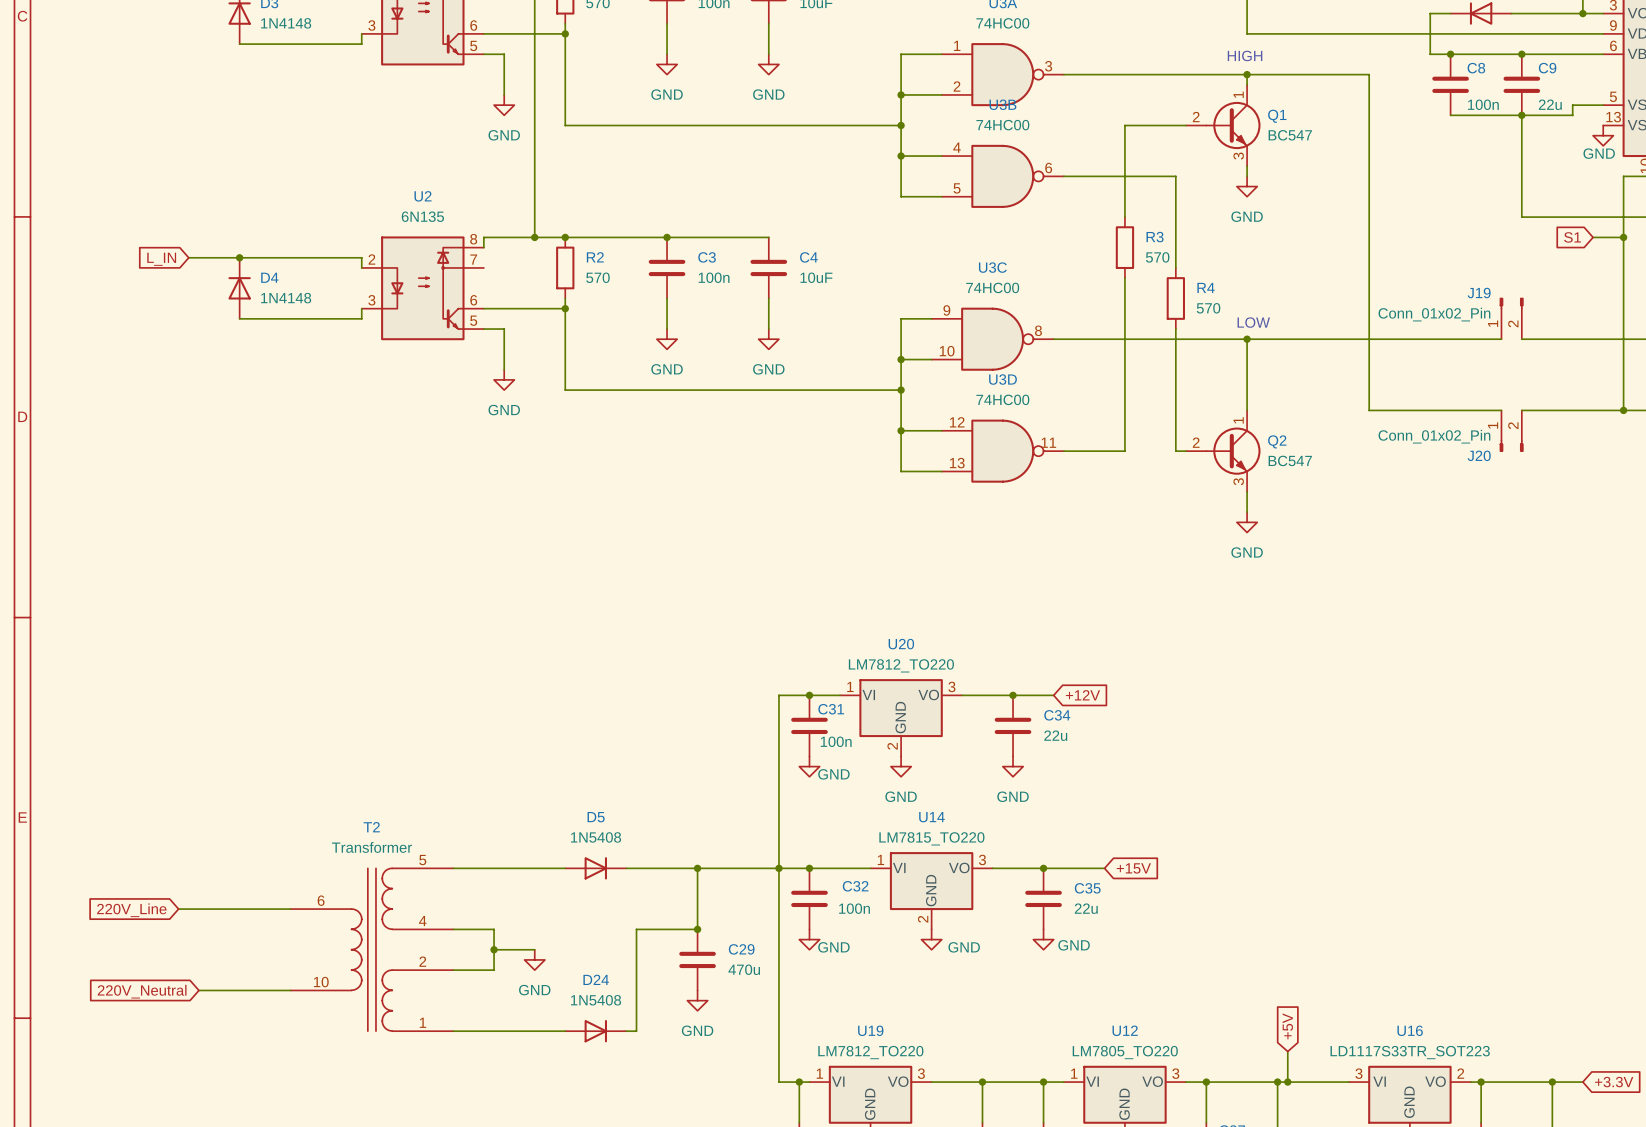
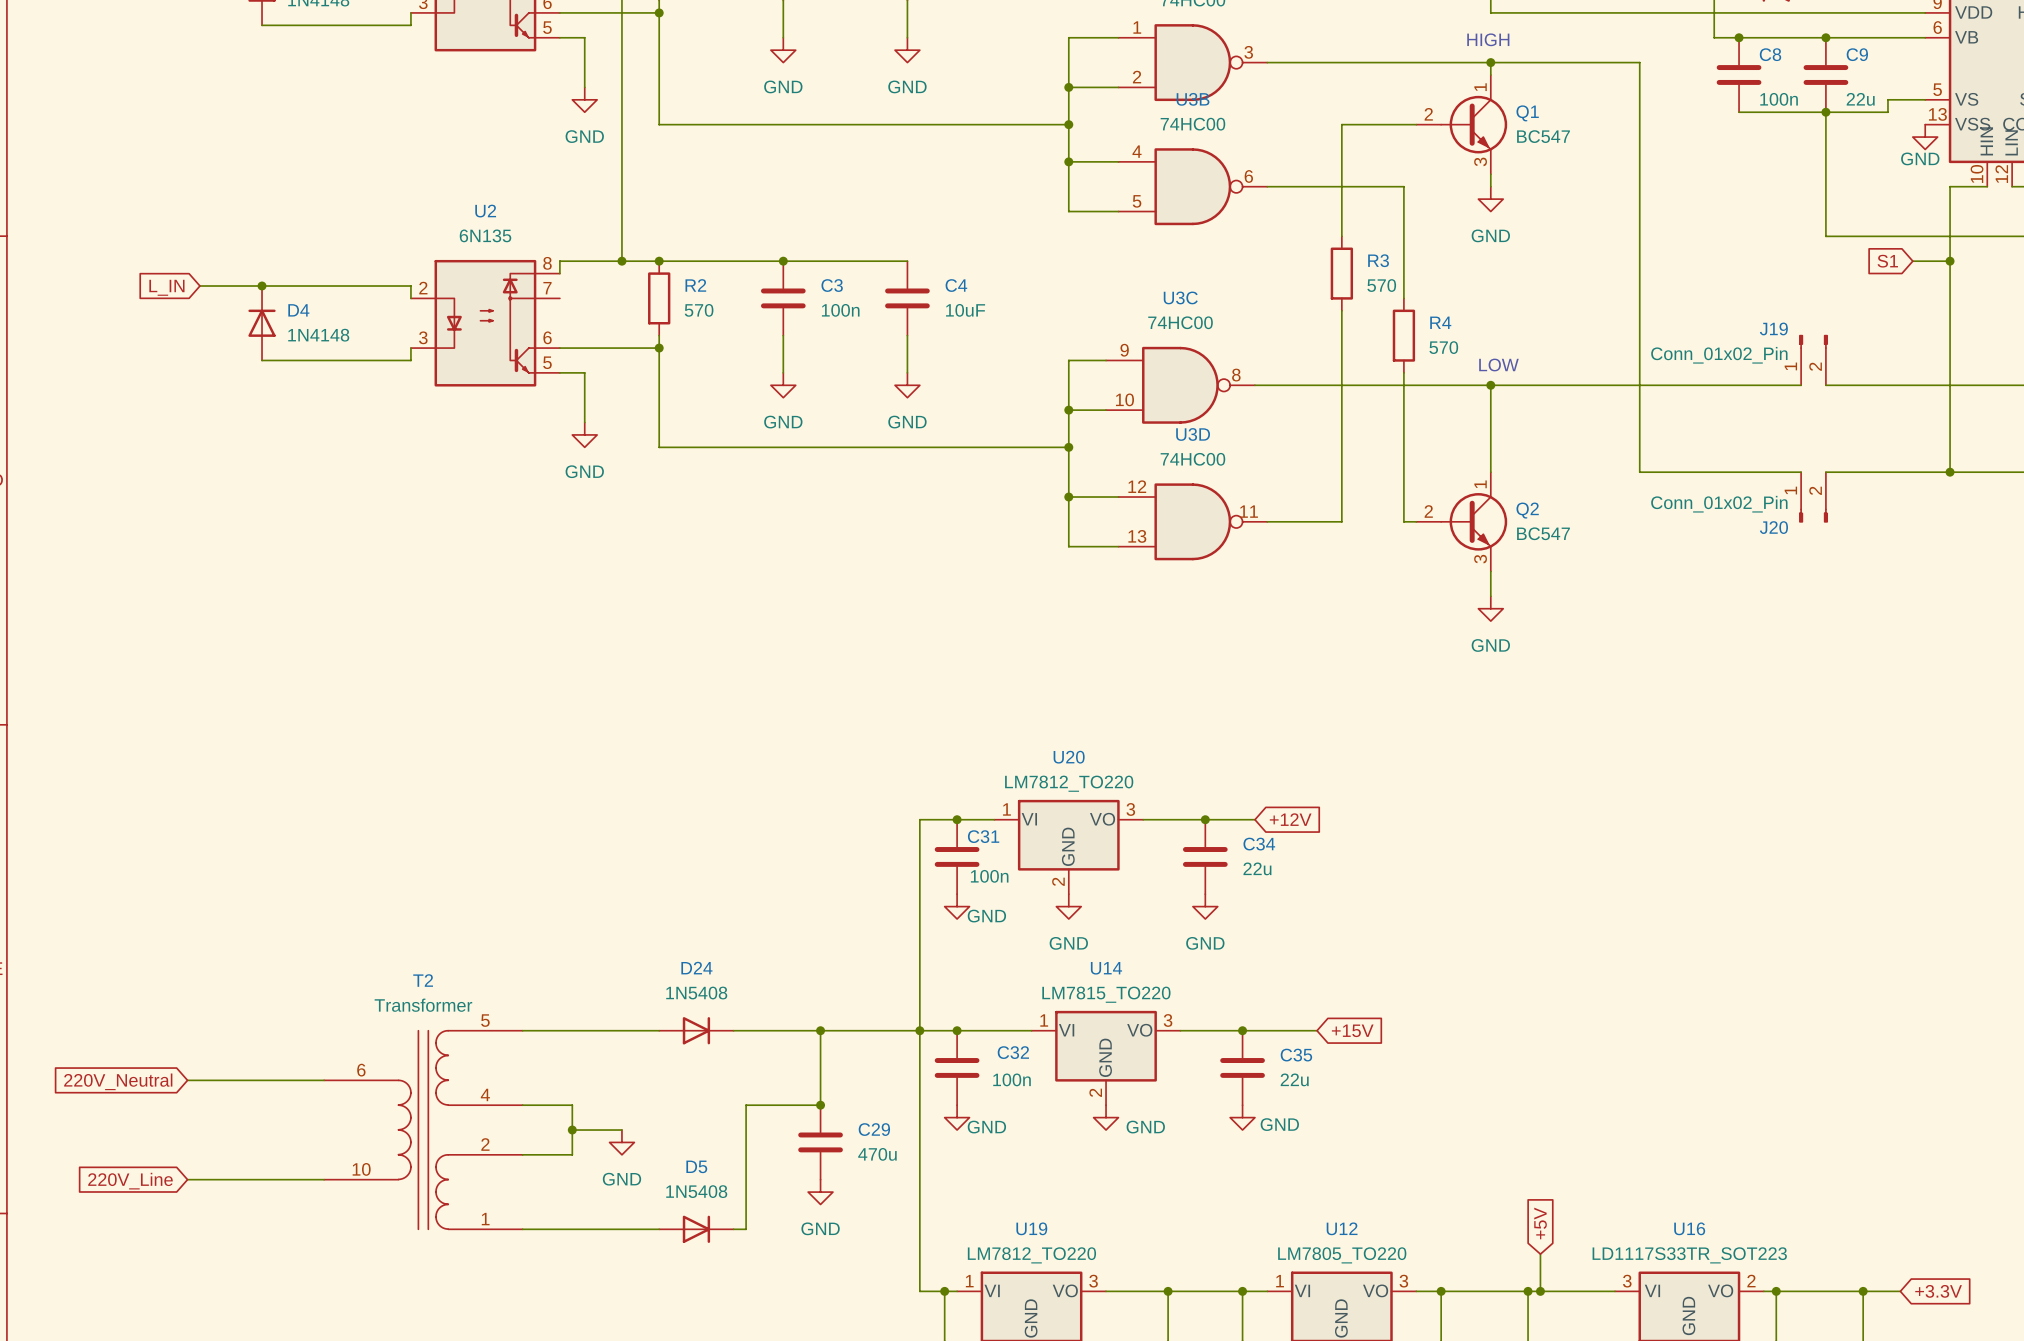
D5 name: D5 (596, 817) -> D24 (696, 968)
global label: 220V_Line (131, 910) -> 220V_Neutral (118, 1081)
D24 name: D24 (596, 979) -> D5 (696, 1166)
wire: none -> (187, 1179) (212, 1179)
global label: none -> 220V_Line (130, 1181)
global label: 220V_Neutral (142, 991) -> none

